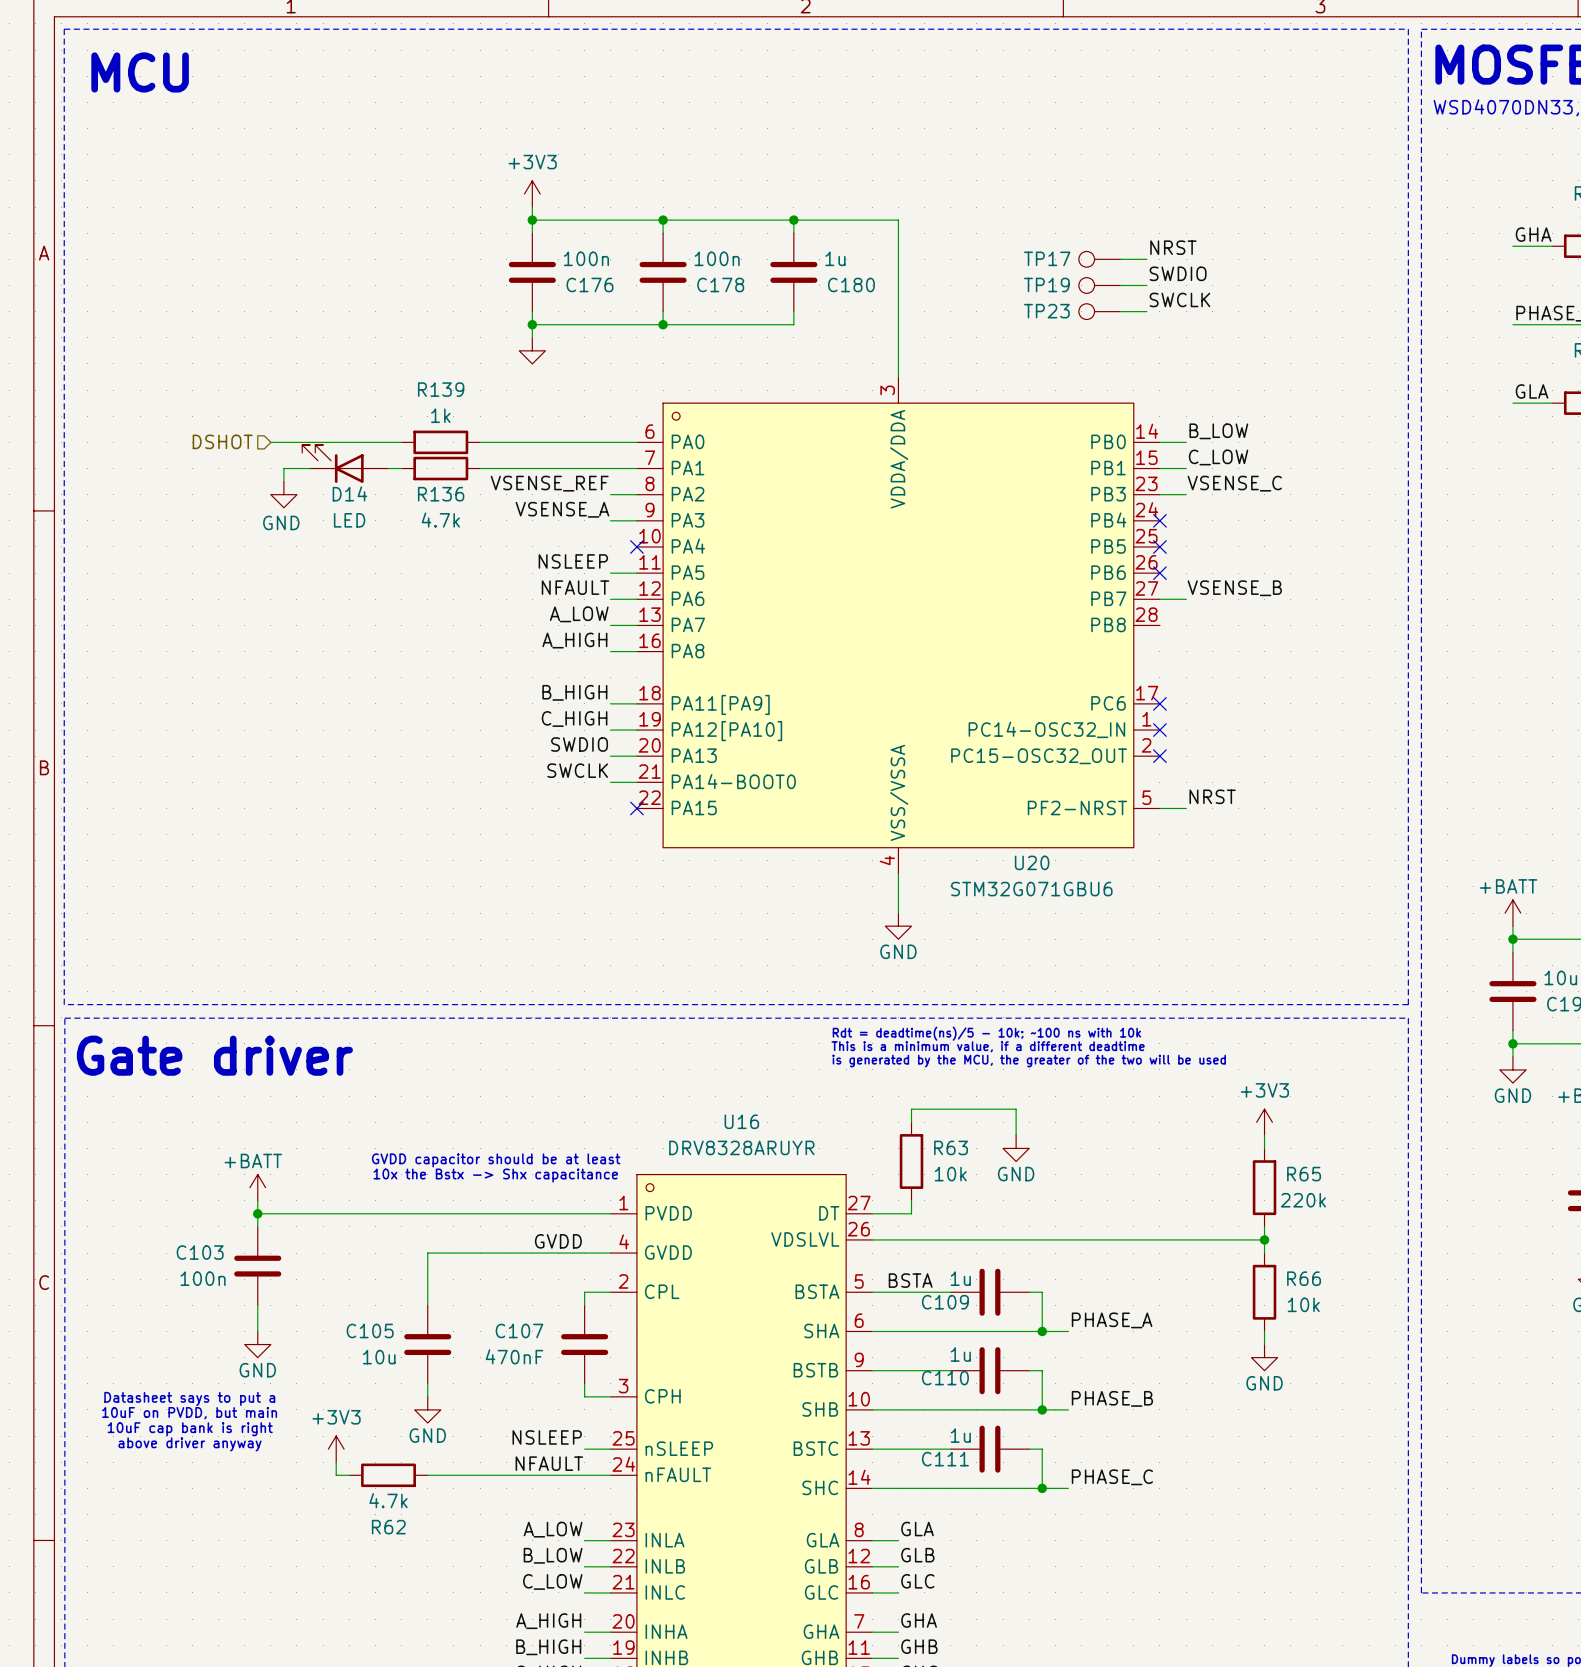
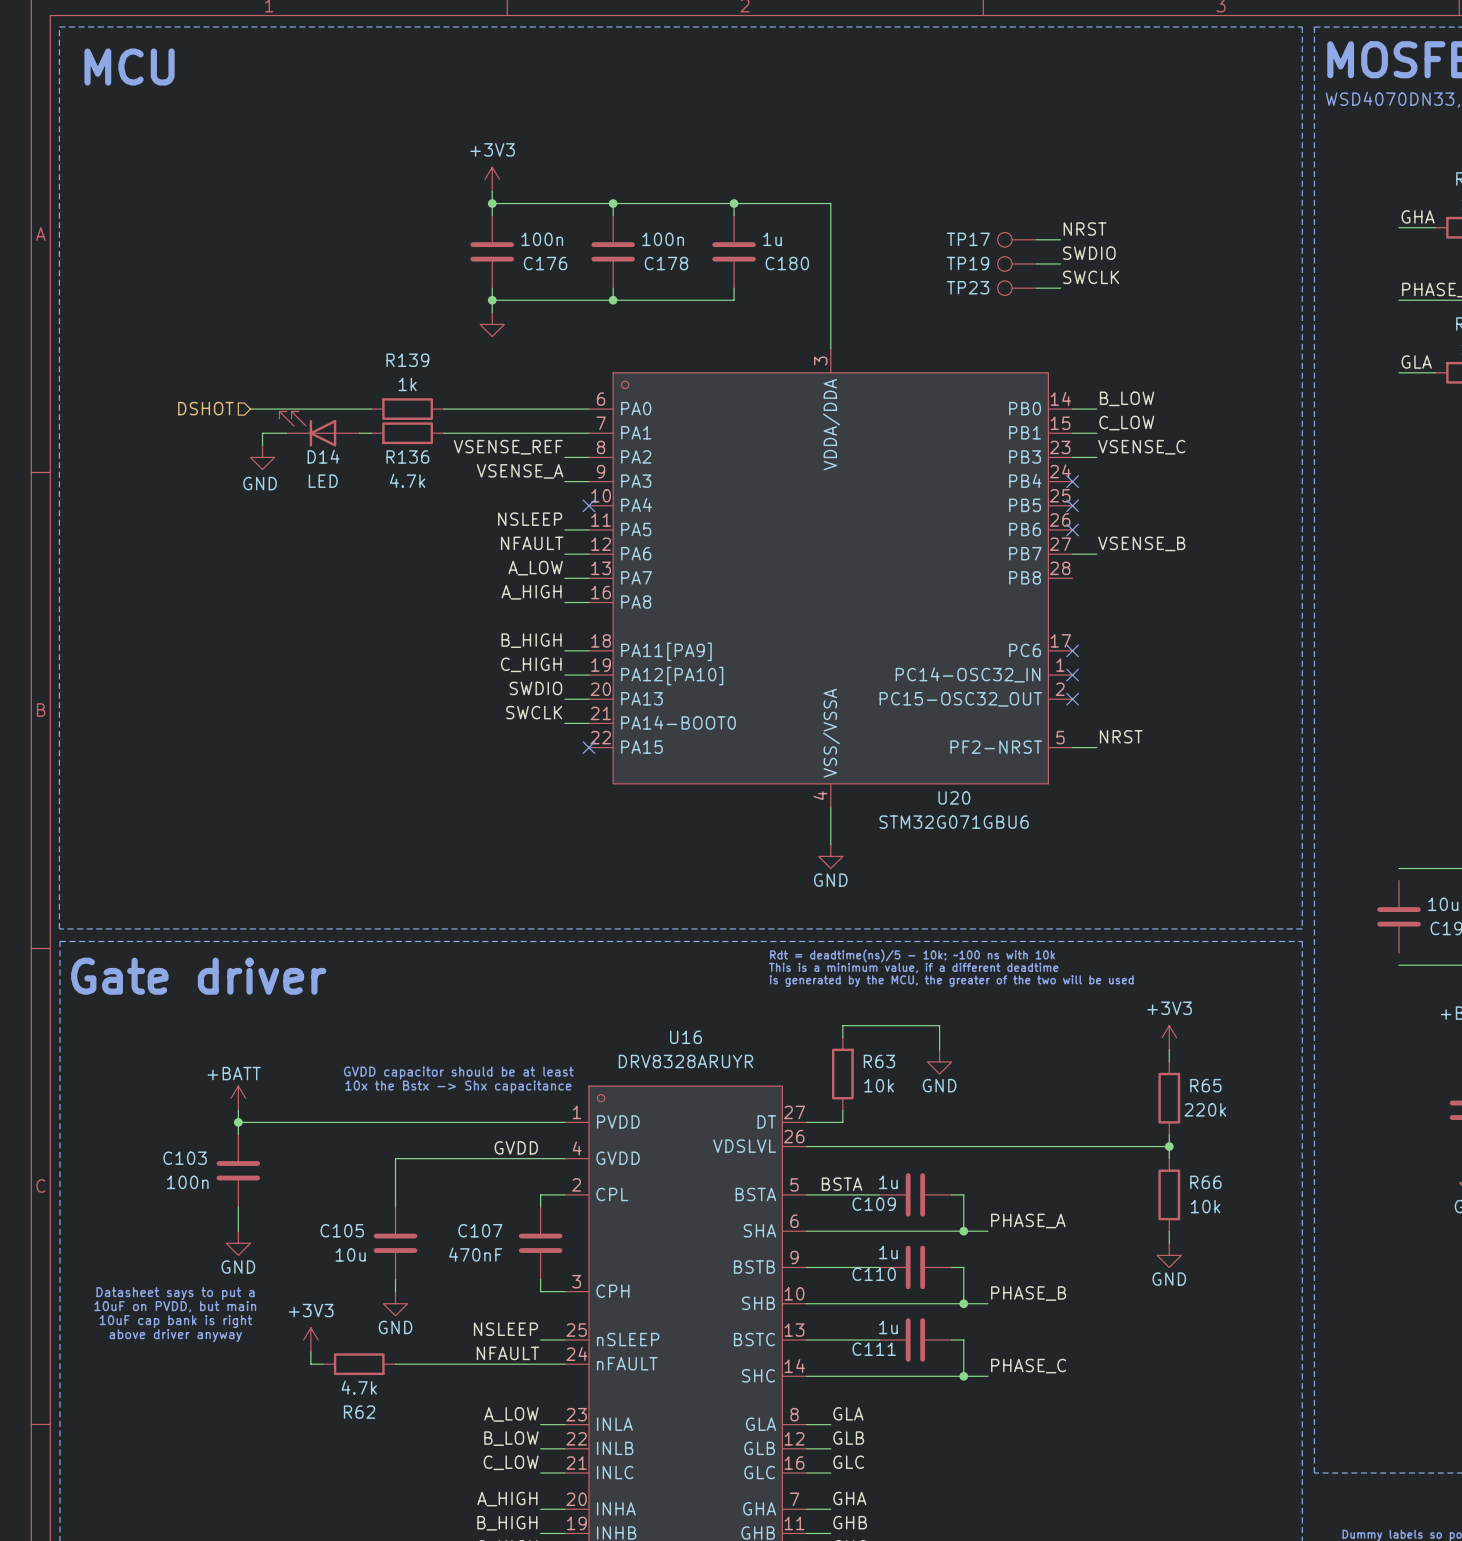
power symbol: +BATT (1512, 913) -> none
wire: (1512, 926) (1512, 952) -> none
junction: (1512, 939) -> none
wire: (1512, 1030) (1512, 1056) -> none
junction: (1512, 1043) -> none
power symbol: GND (1512, 1069) -> none

